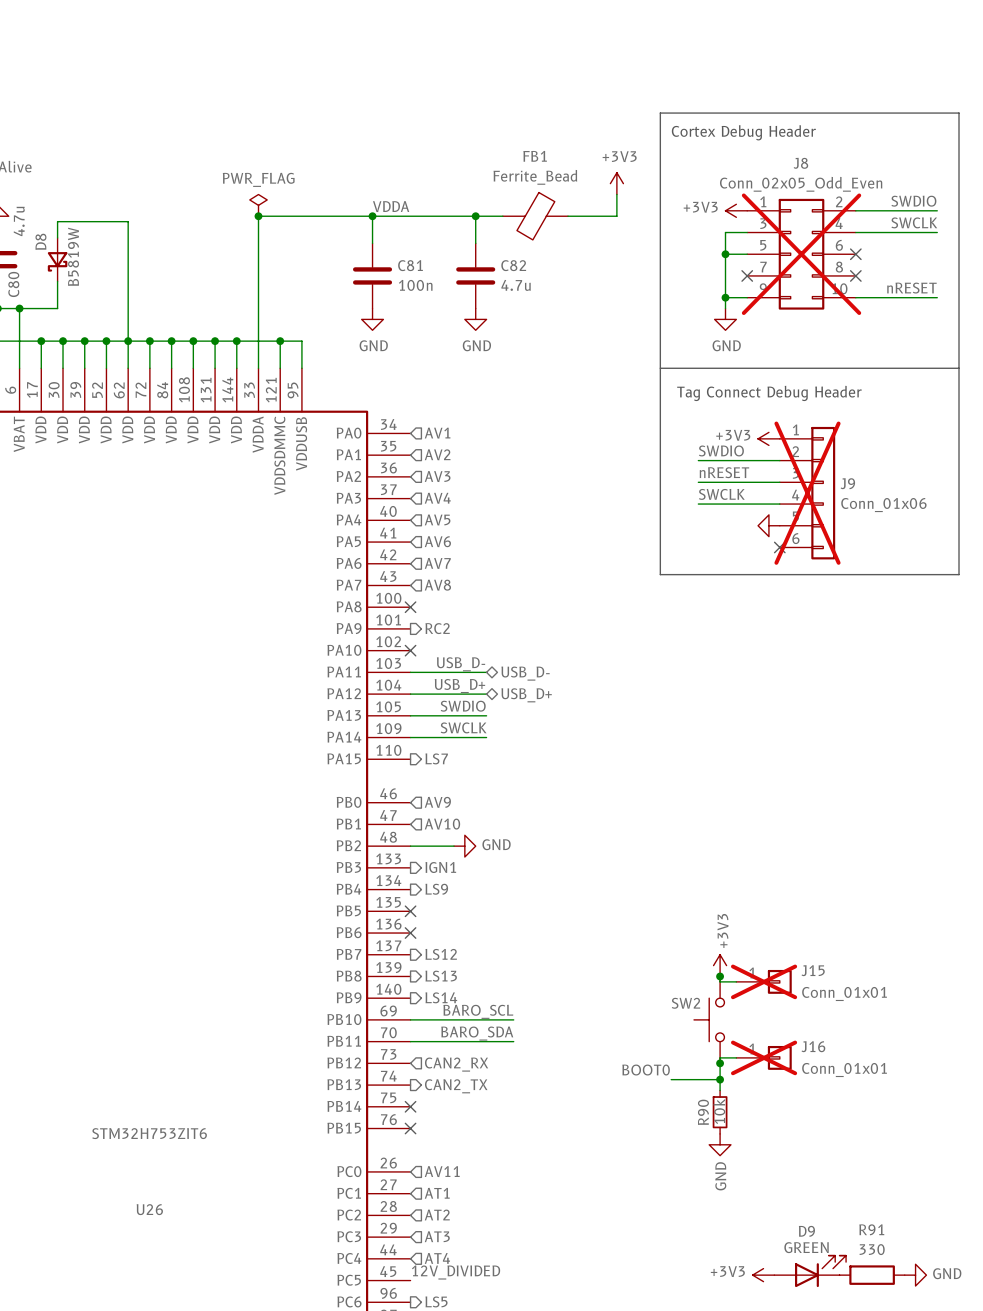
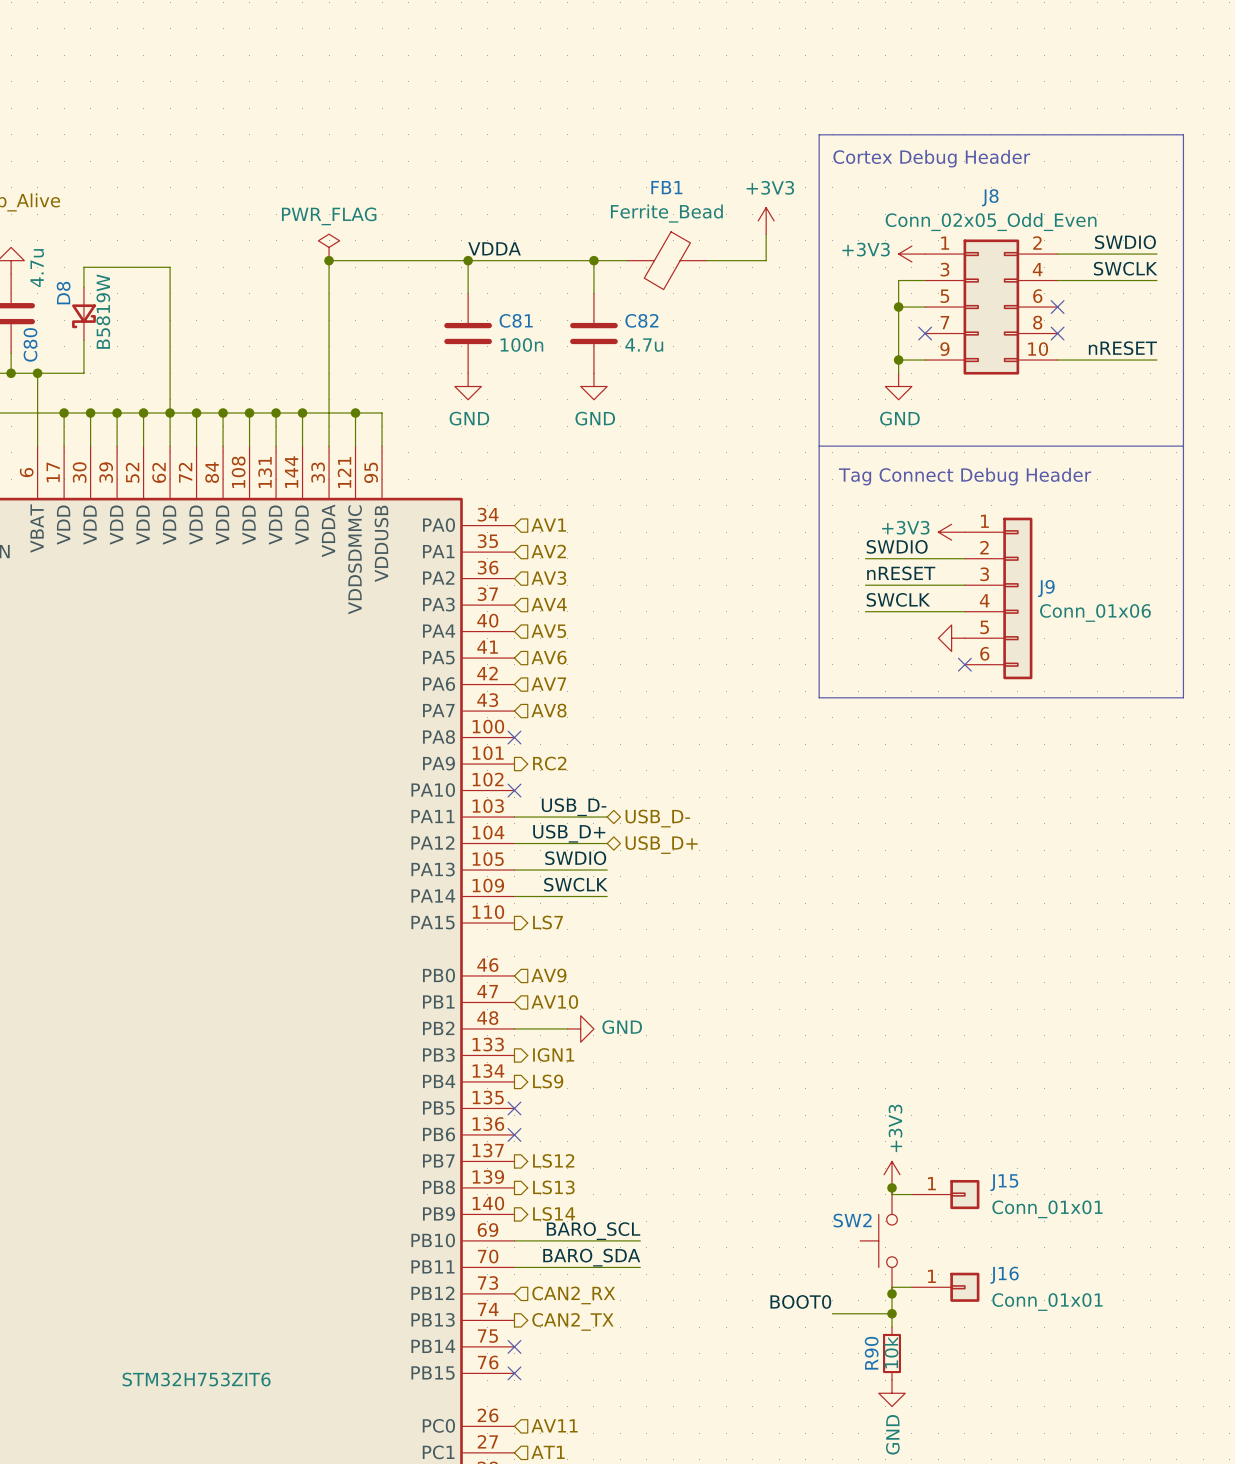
J8 do-not-place cross: (801, 254) -> none
J9 do-not-place cross: (807, 493) -> none
J15 do-not-place cross: (764, 981) -> none
J16 do-not-place cross: (764, 1057) -> none

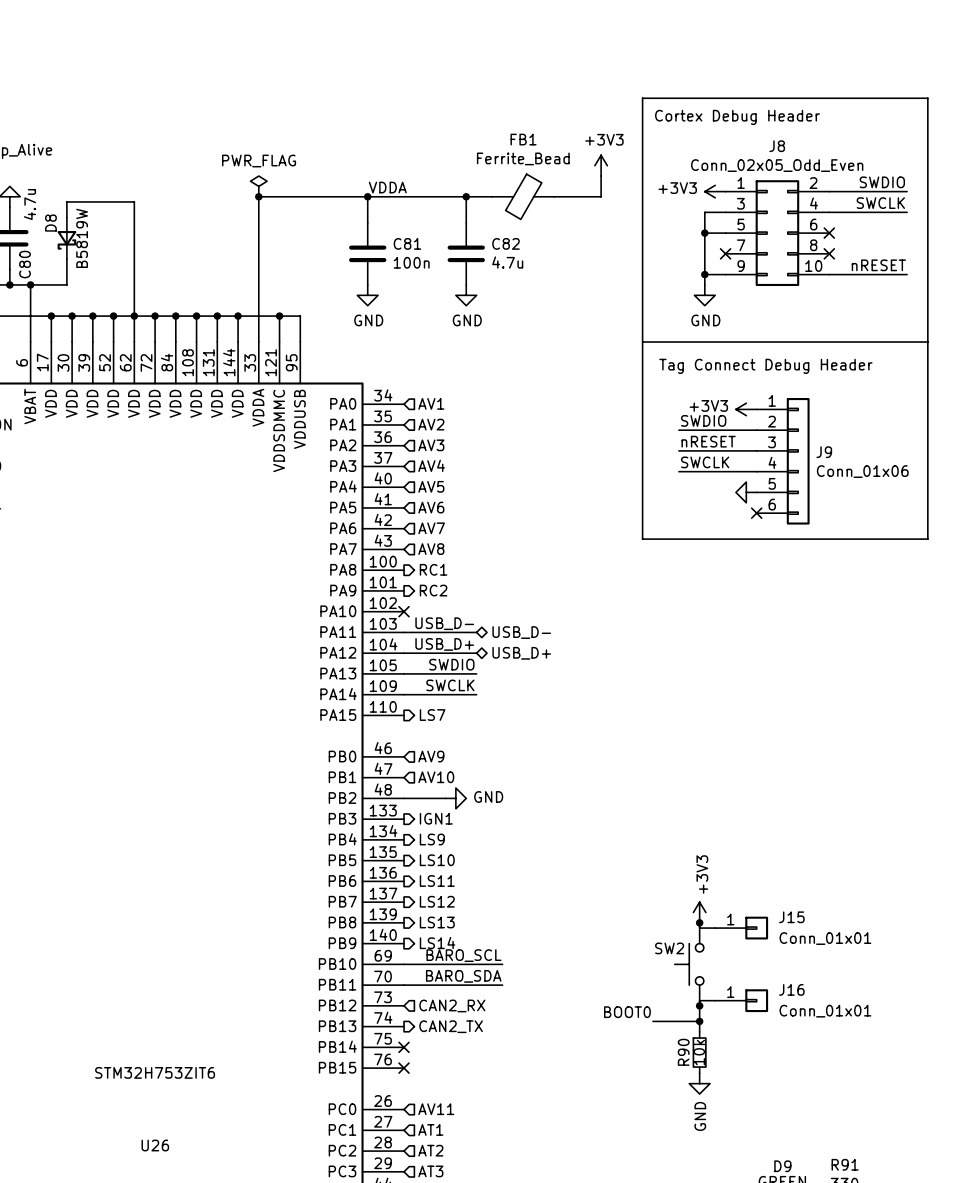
no-connect mark: (514, 737) -> none
hierarchical label: none -> RC1 (433, 569)
hierarchical label: none -> LS10 (437, 860)
no-connect mark: (514, 1108) -> none
no-connect mark: (514, 1134) -> none
hierarchical label: none -> LS11 (437, 881)

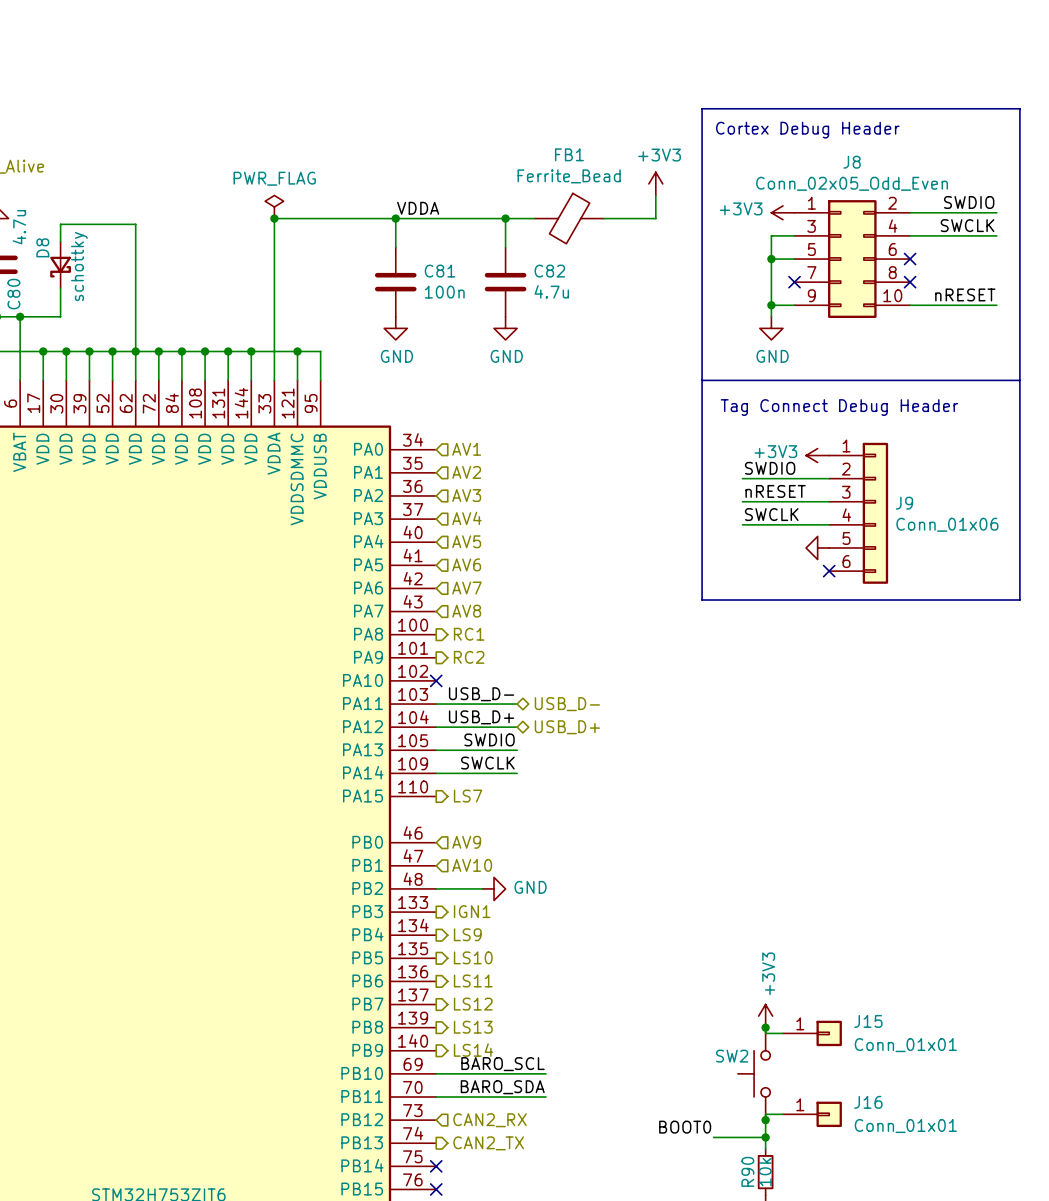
D8 value: B5819W (82, 238) -> schottky (79, 266)

